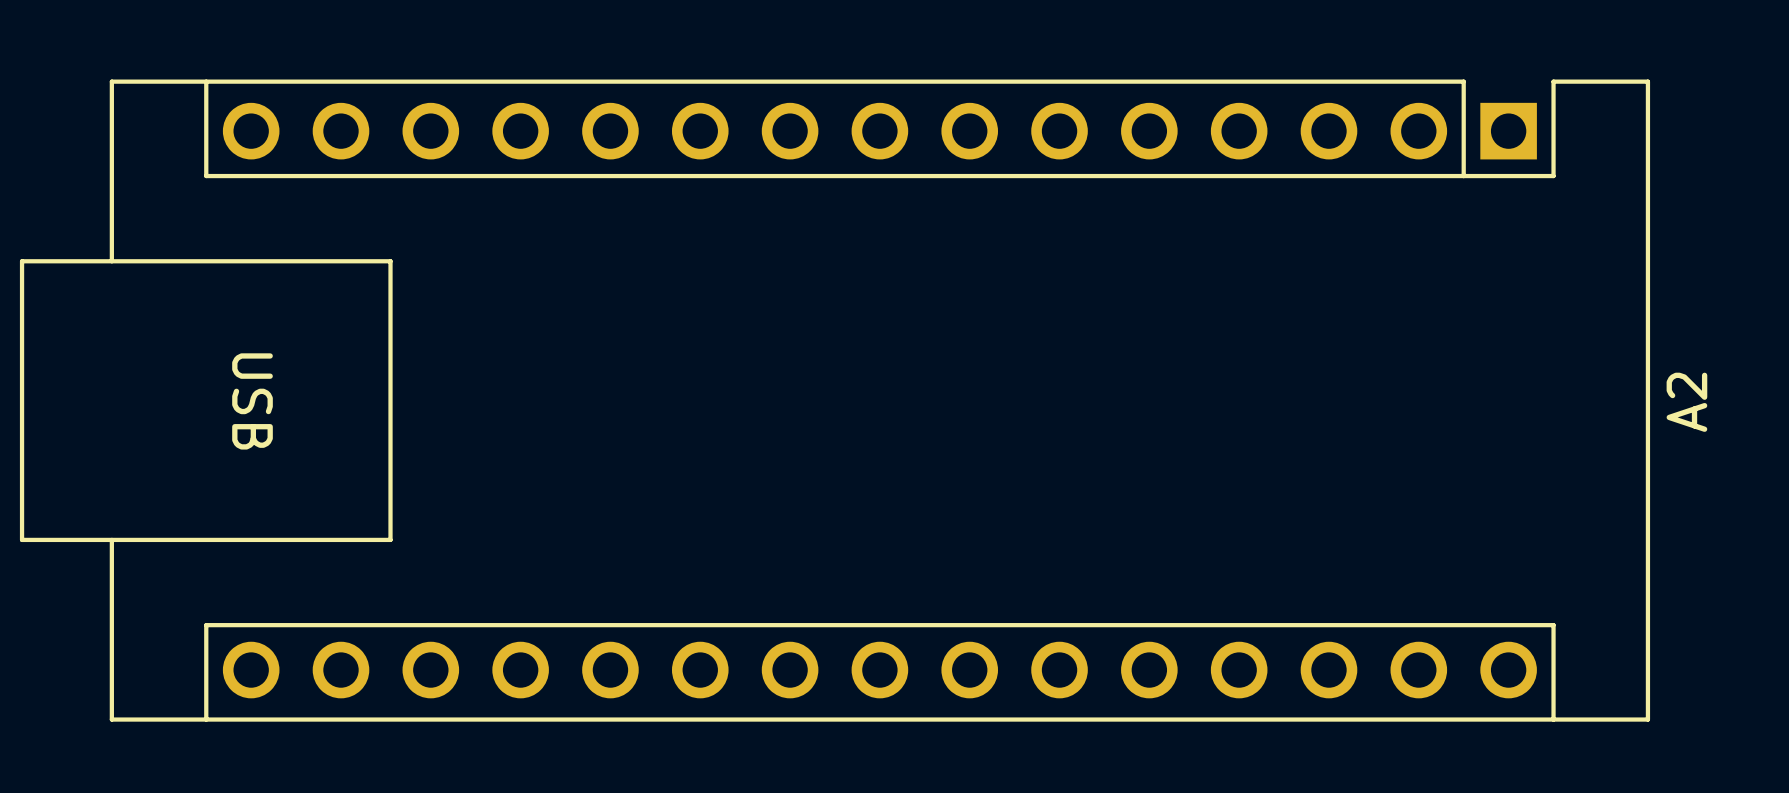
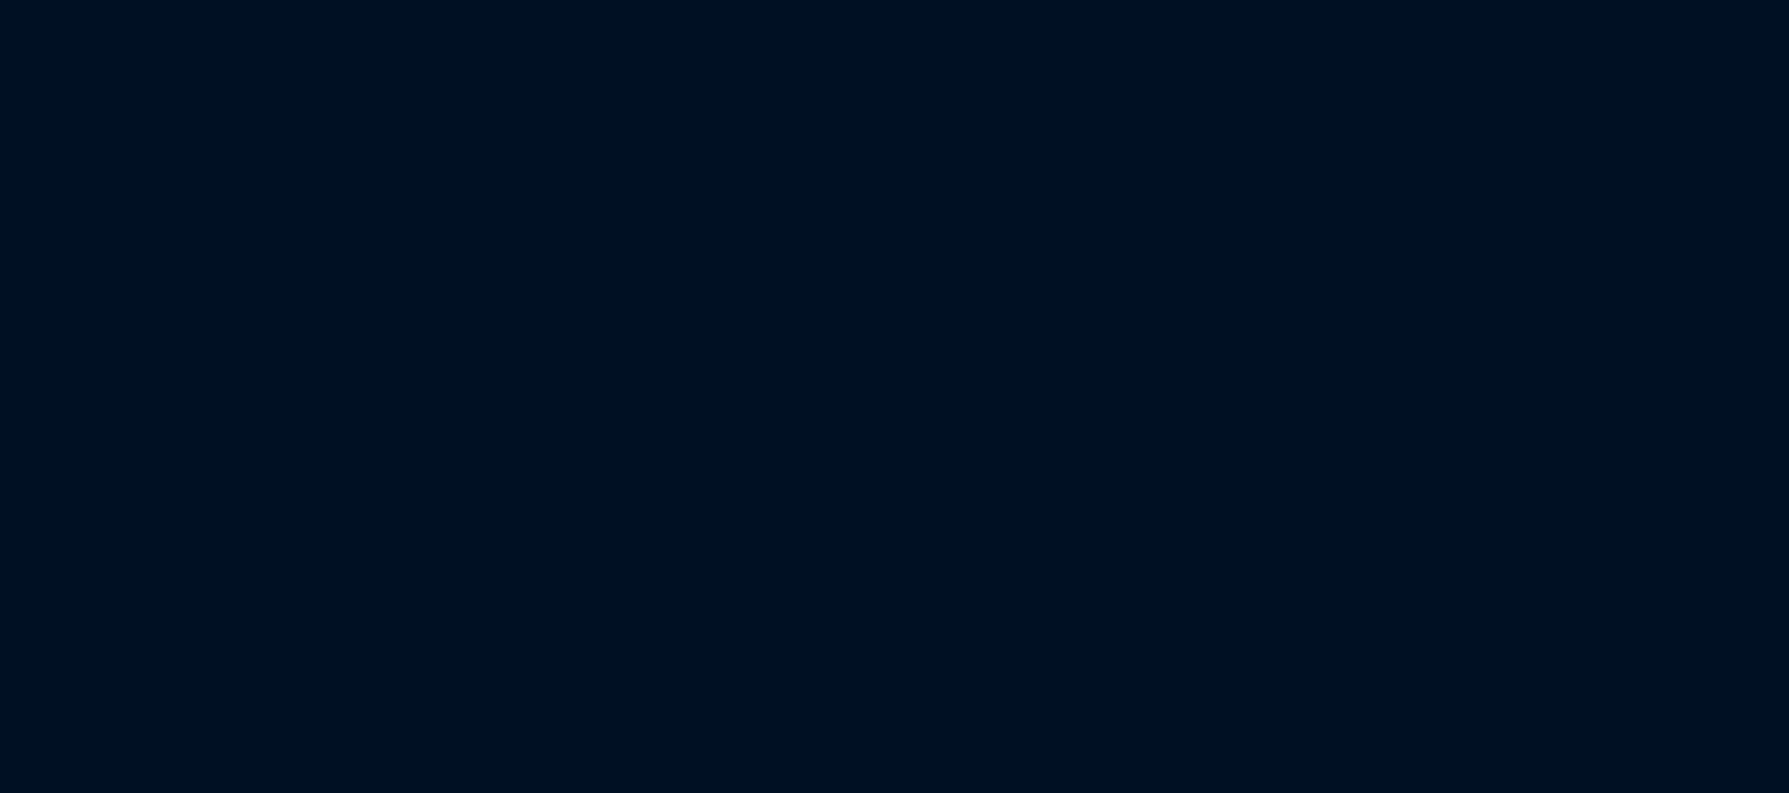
A2: (834, 400) -> none

